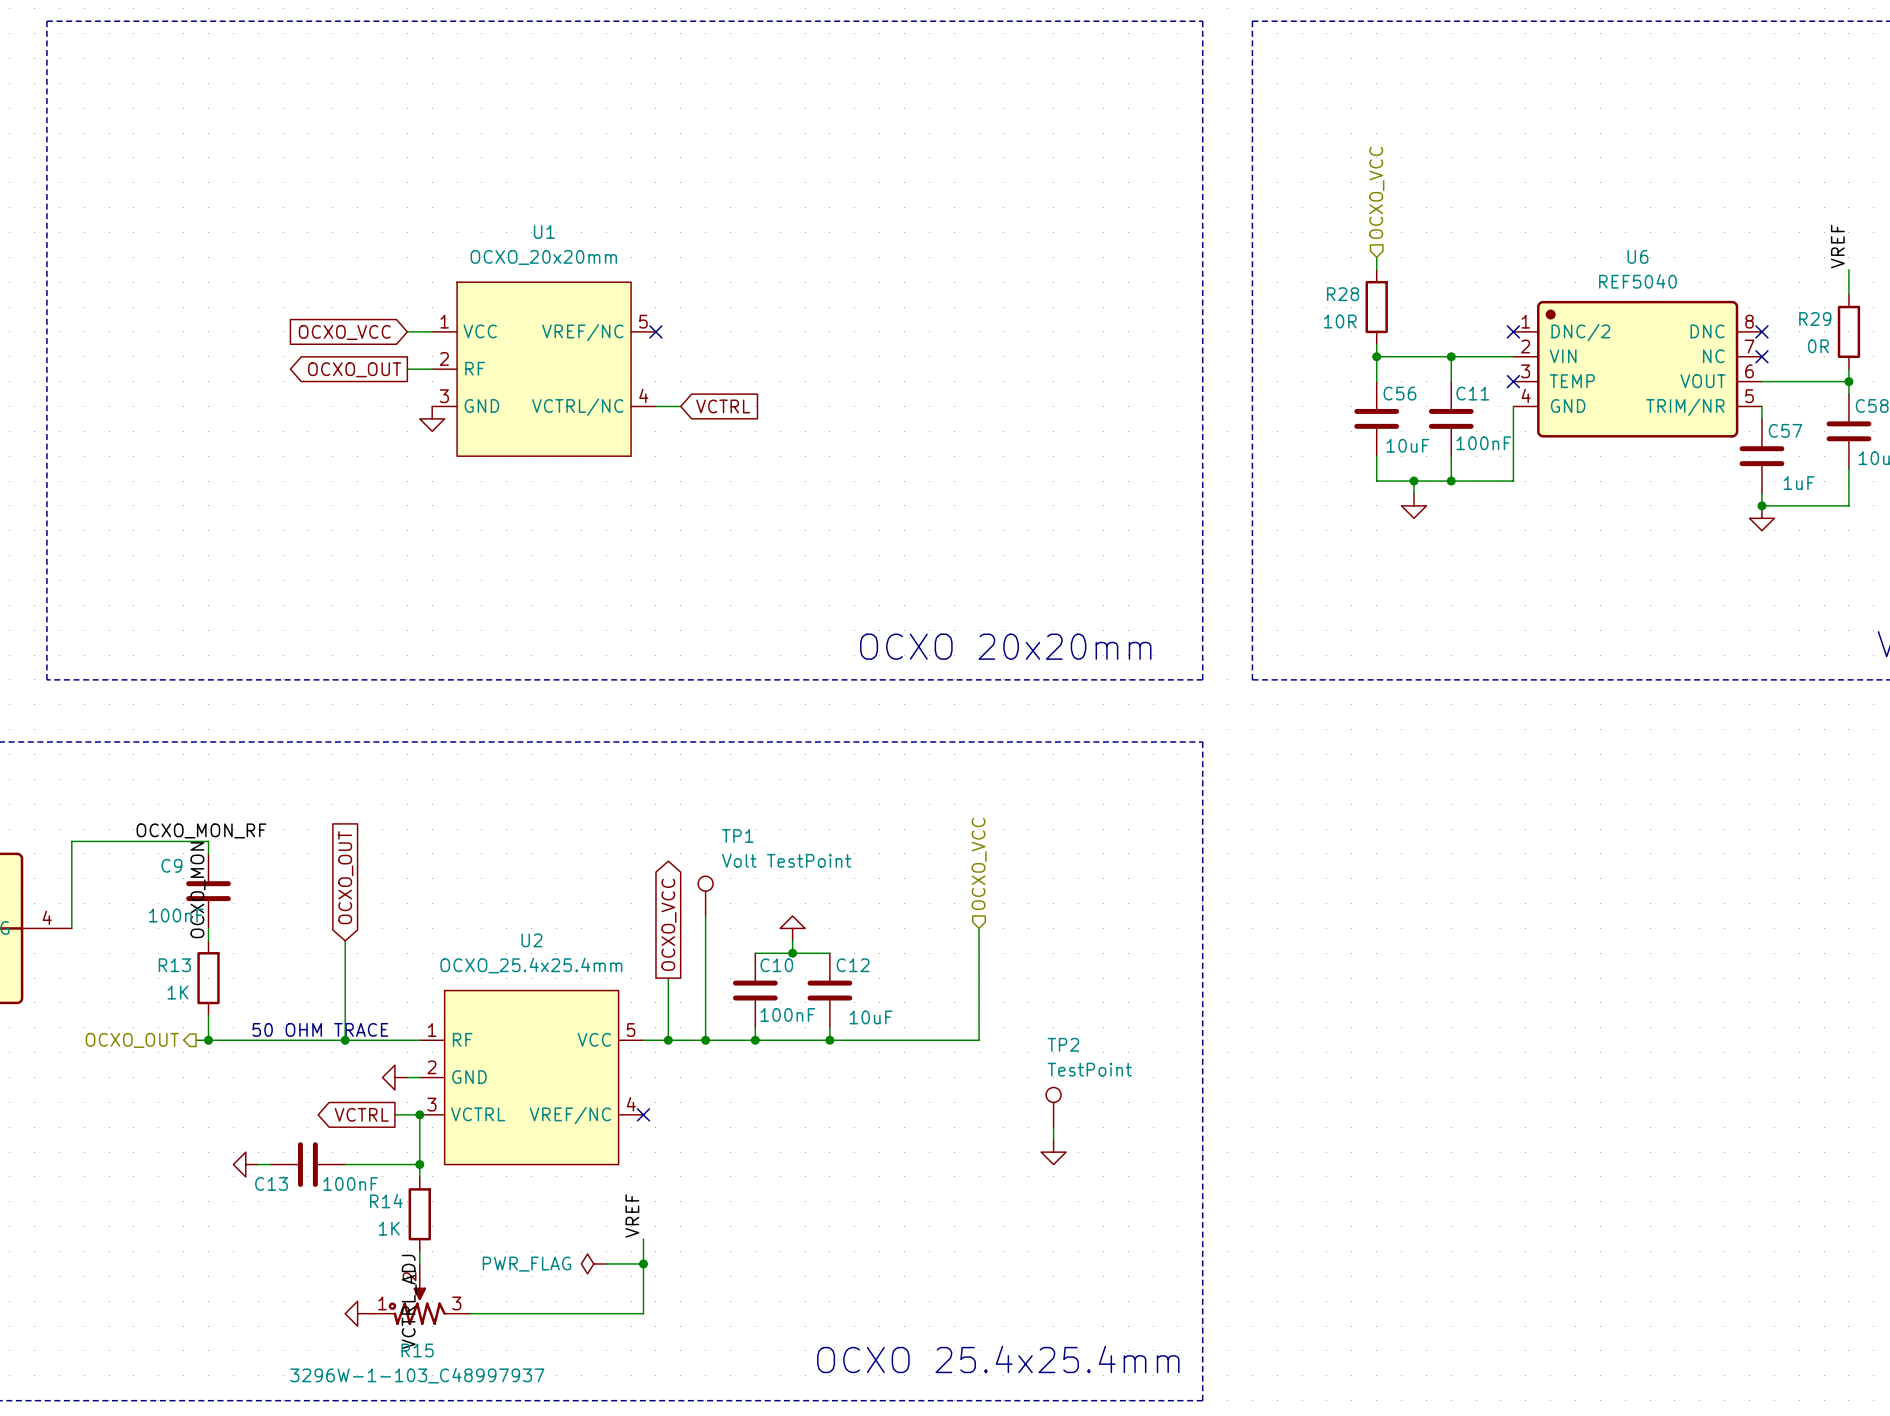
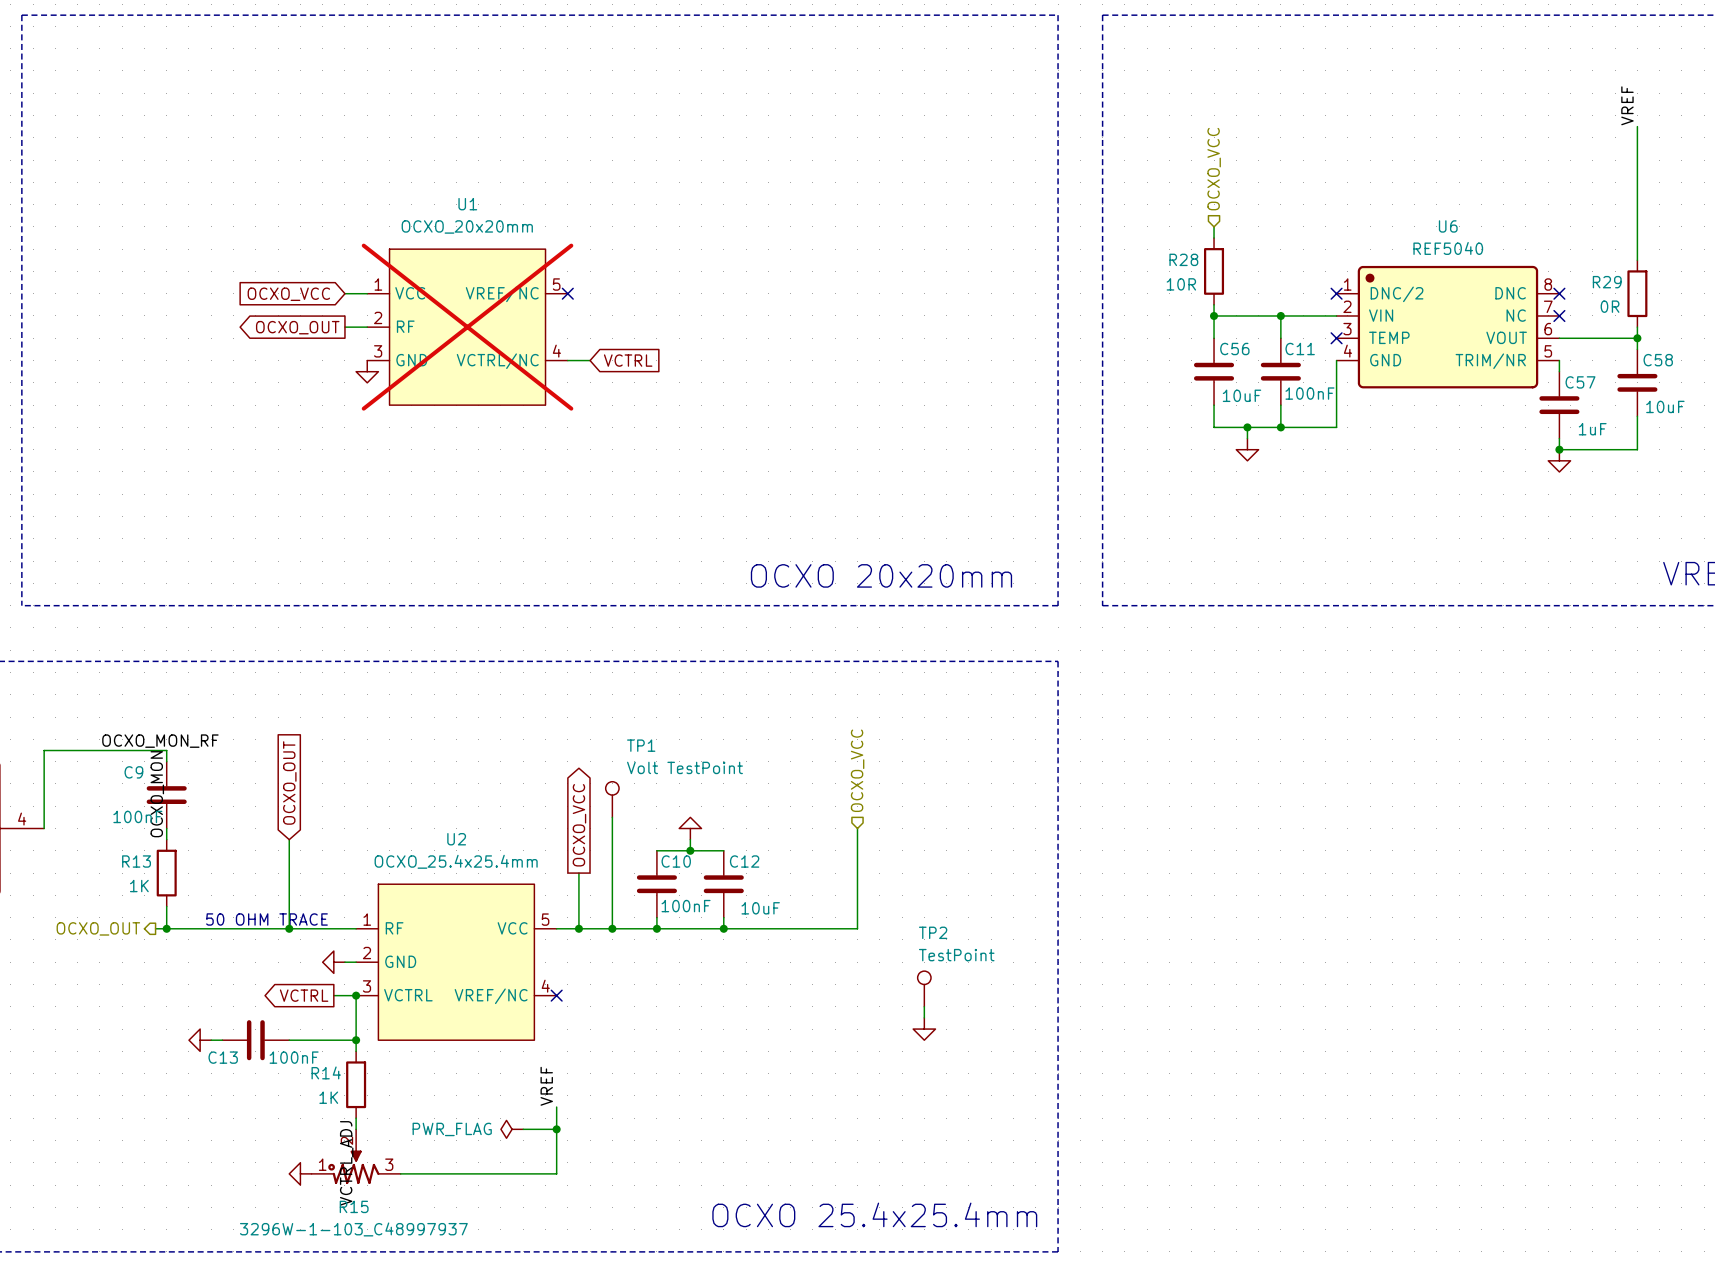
wire: none -> (1637, 126) (1637, 238)
label position: VREF (1837, 246) -> VREF (1627, 105)
U1 do-not-place cross: none -> (467, 327)

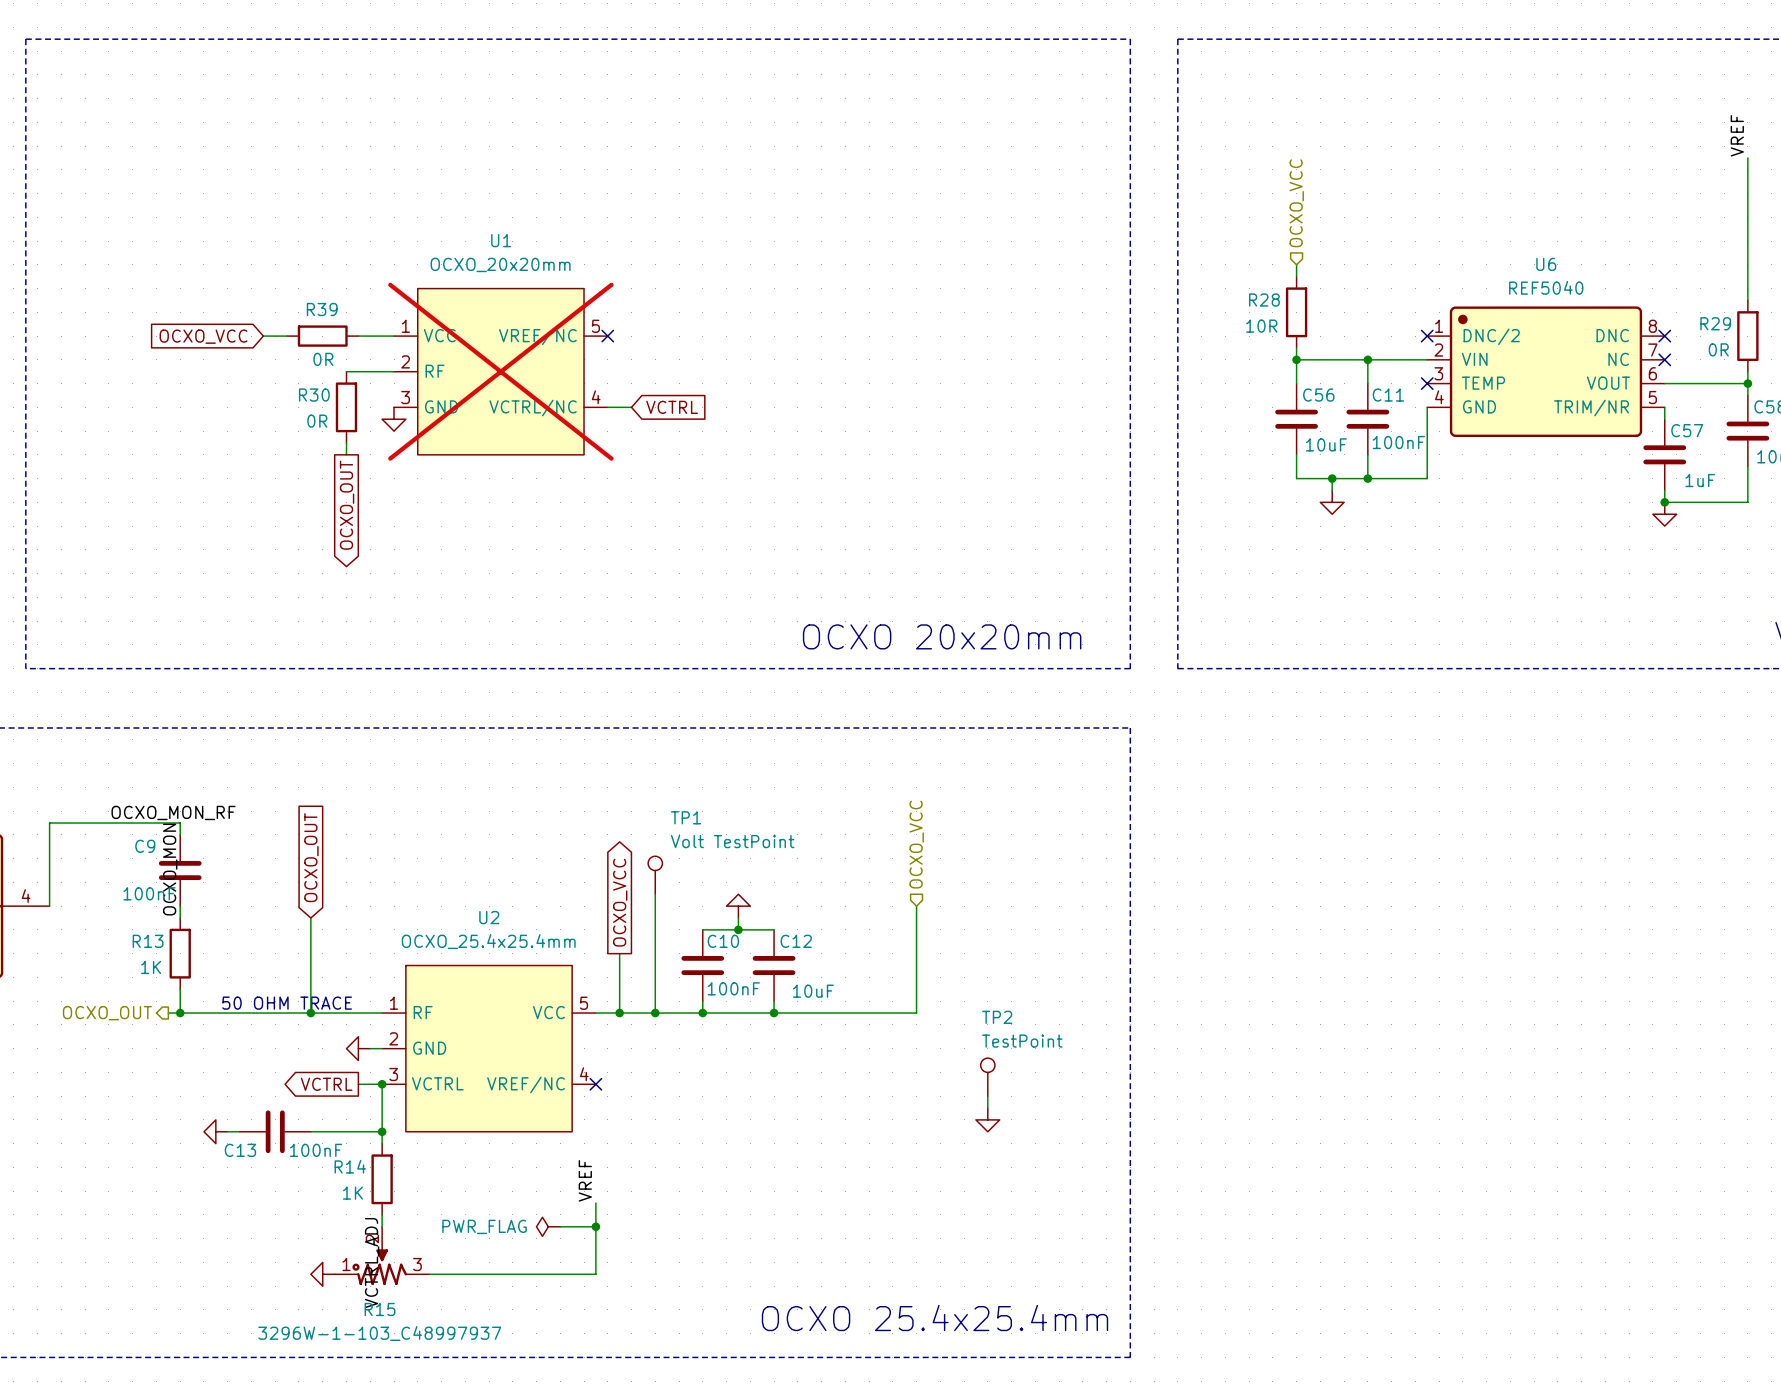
wire: none -> (263, 336) (287, 336)
R39: none -> 0R (322, 336)
wire: none -> (358, 336) (370, 336)
global label position: OCXO_VCC (288, 294) -> OCXO_VCC (203, 336)
global label rotation: 0° (297, 327) -> 90° counterclockwise (347, 505)
global label position: OCXO_OUT (297, 327) -> OCXO_OUT (347, 505)
wire: none -> (346, 371) (370, 371)
R30: none -> 0R (346, 407)
wire: none -> (346, 442) (346, 454)

